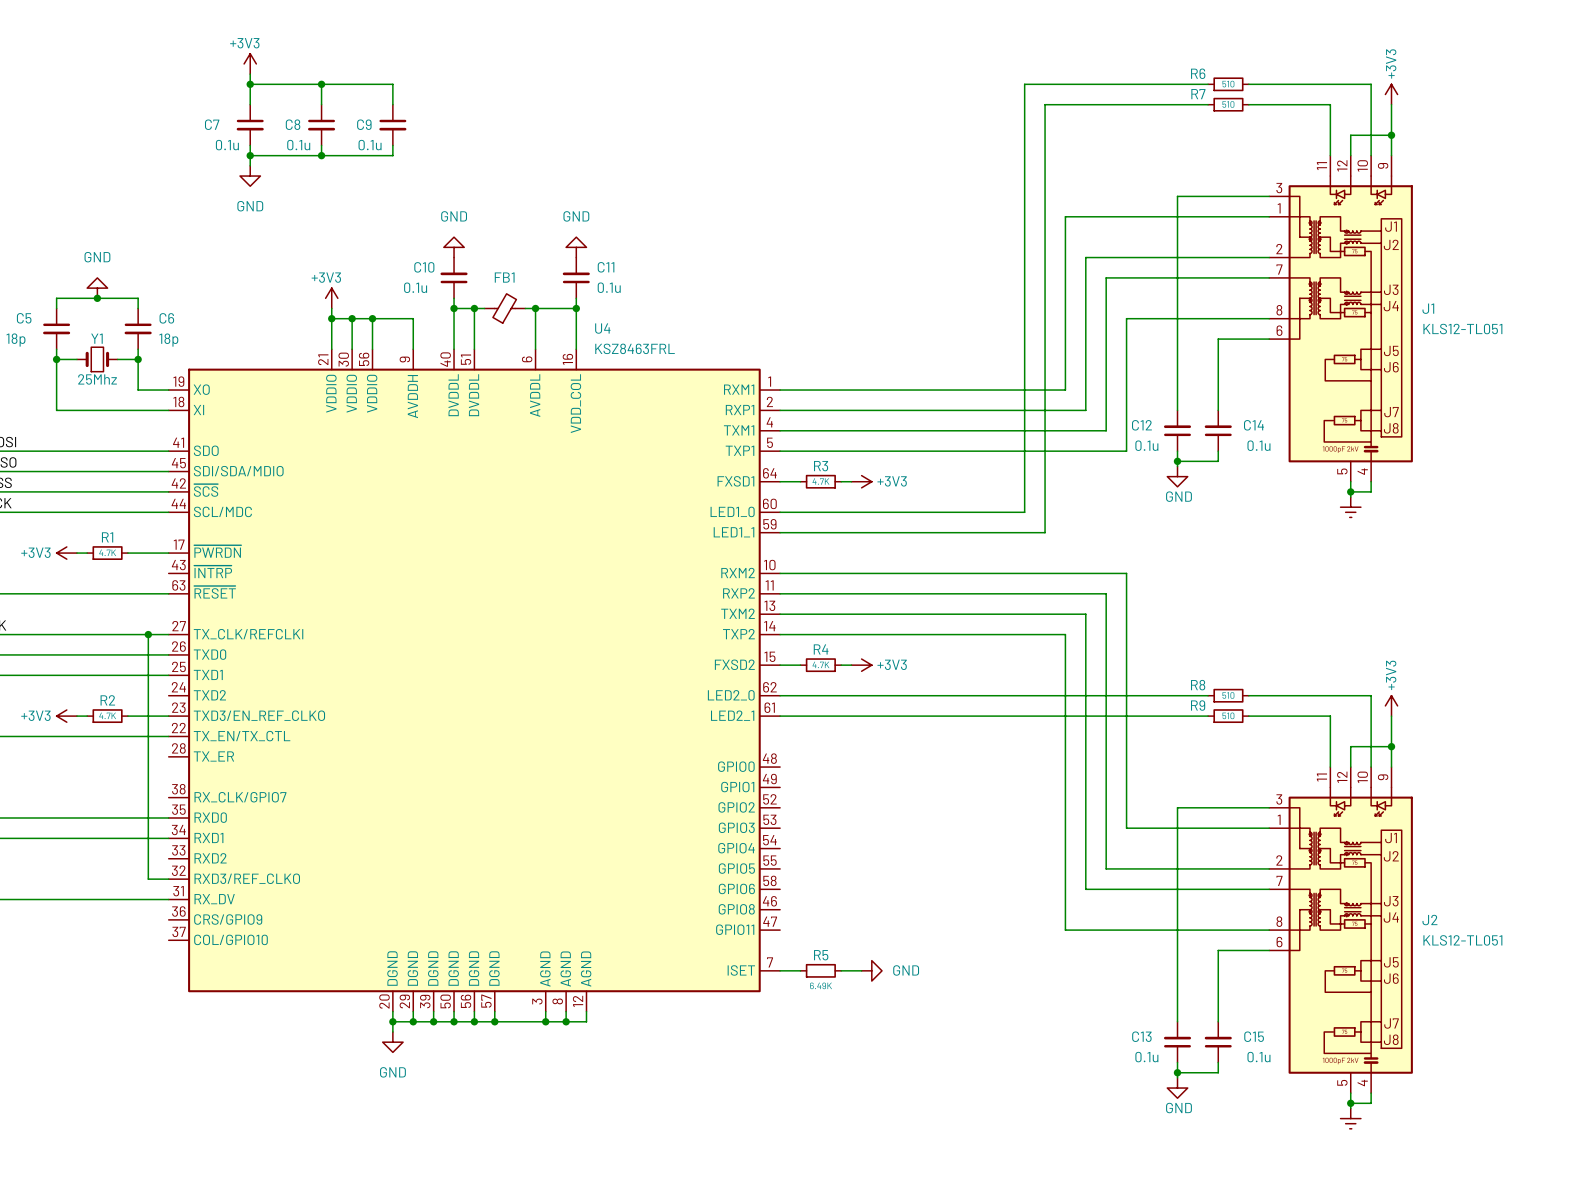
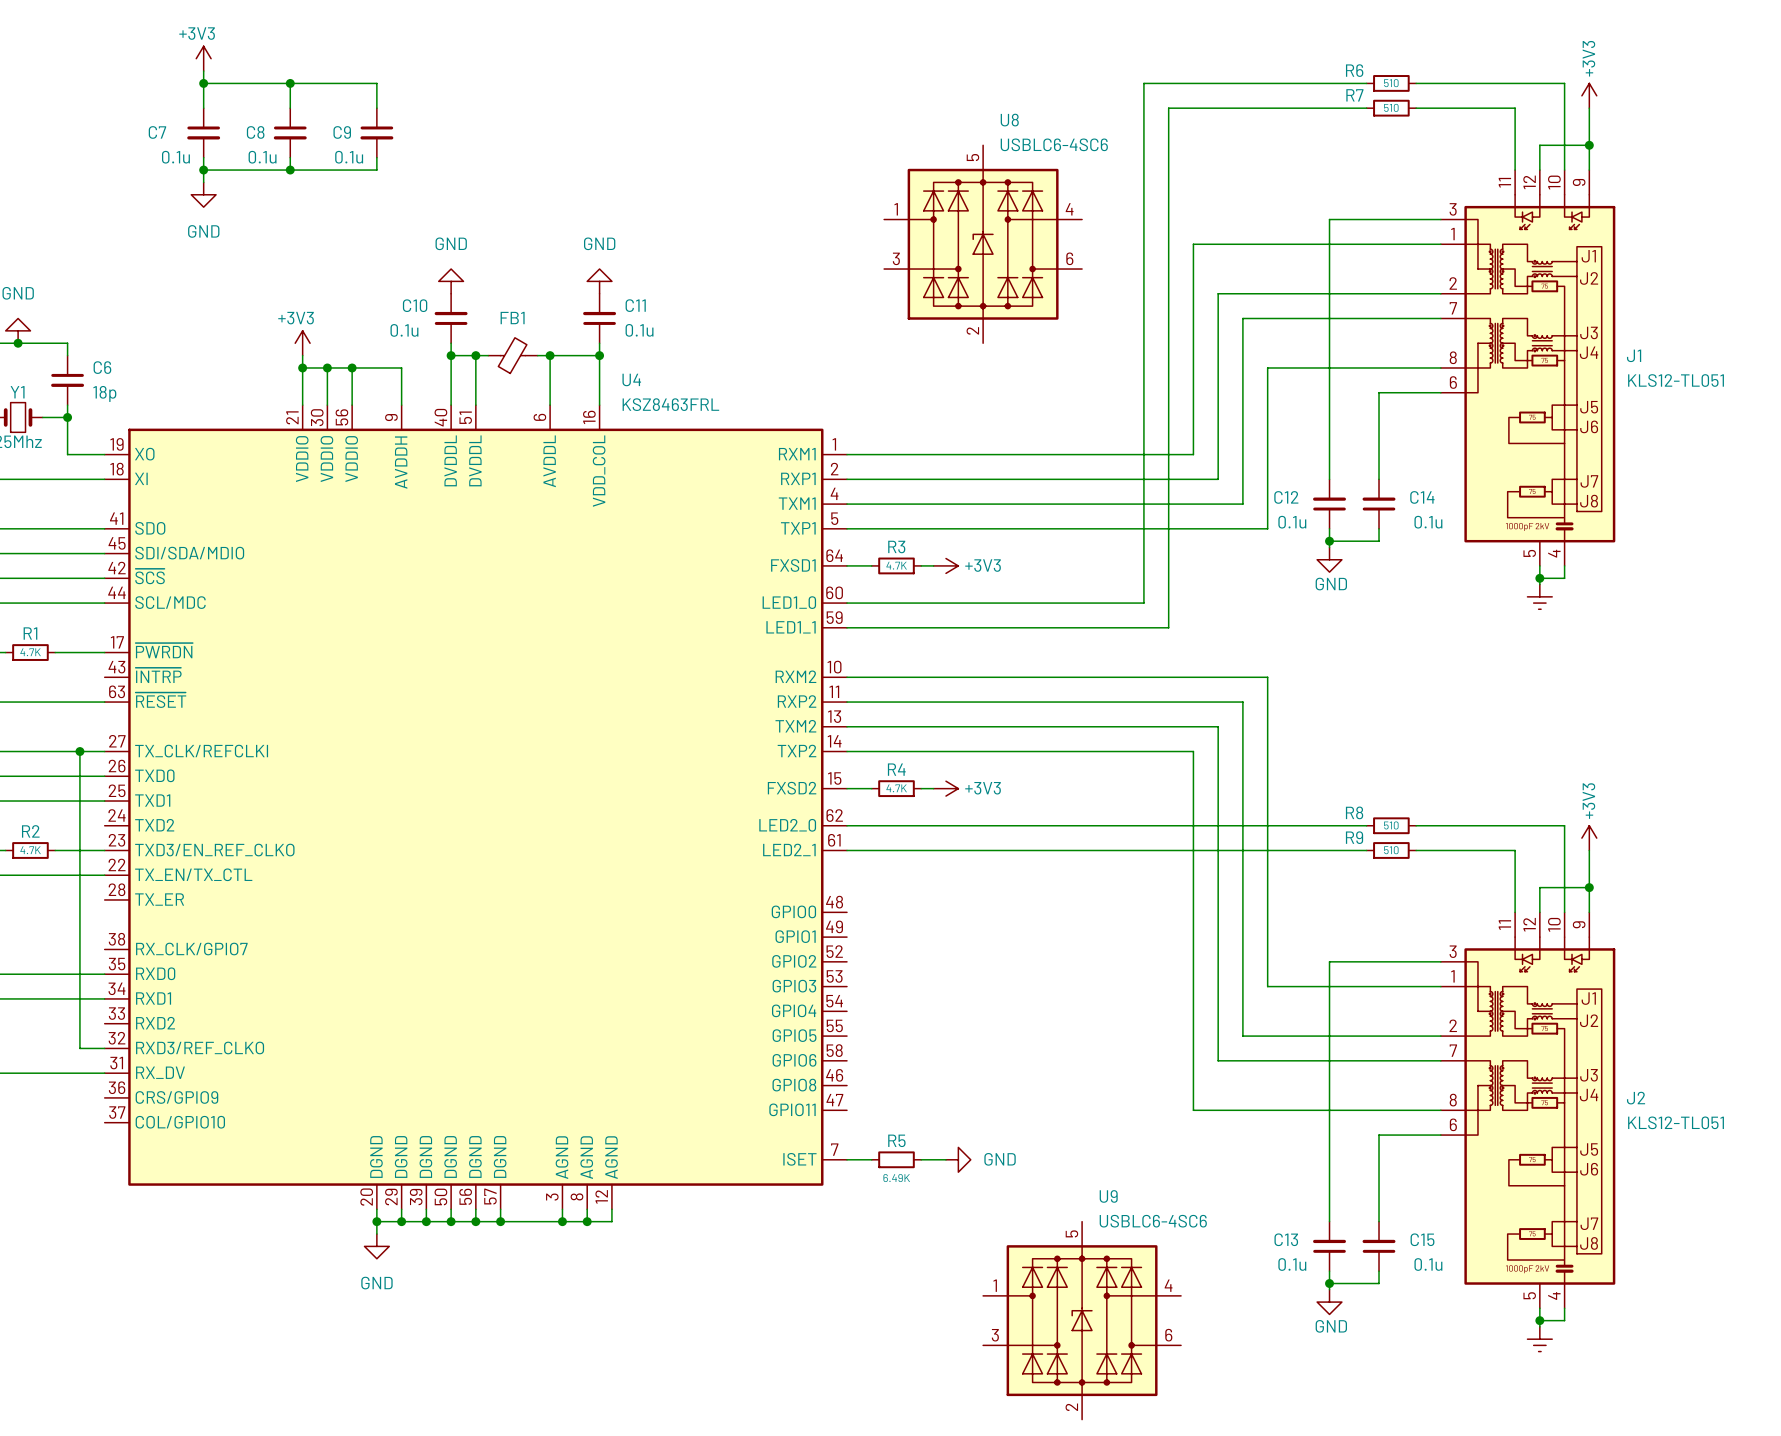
U8: none -> USBLC6-4SC6 (983, 244)
U9: none -> USBLC6-4SC6 (1082, 1320)

